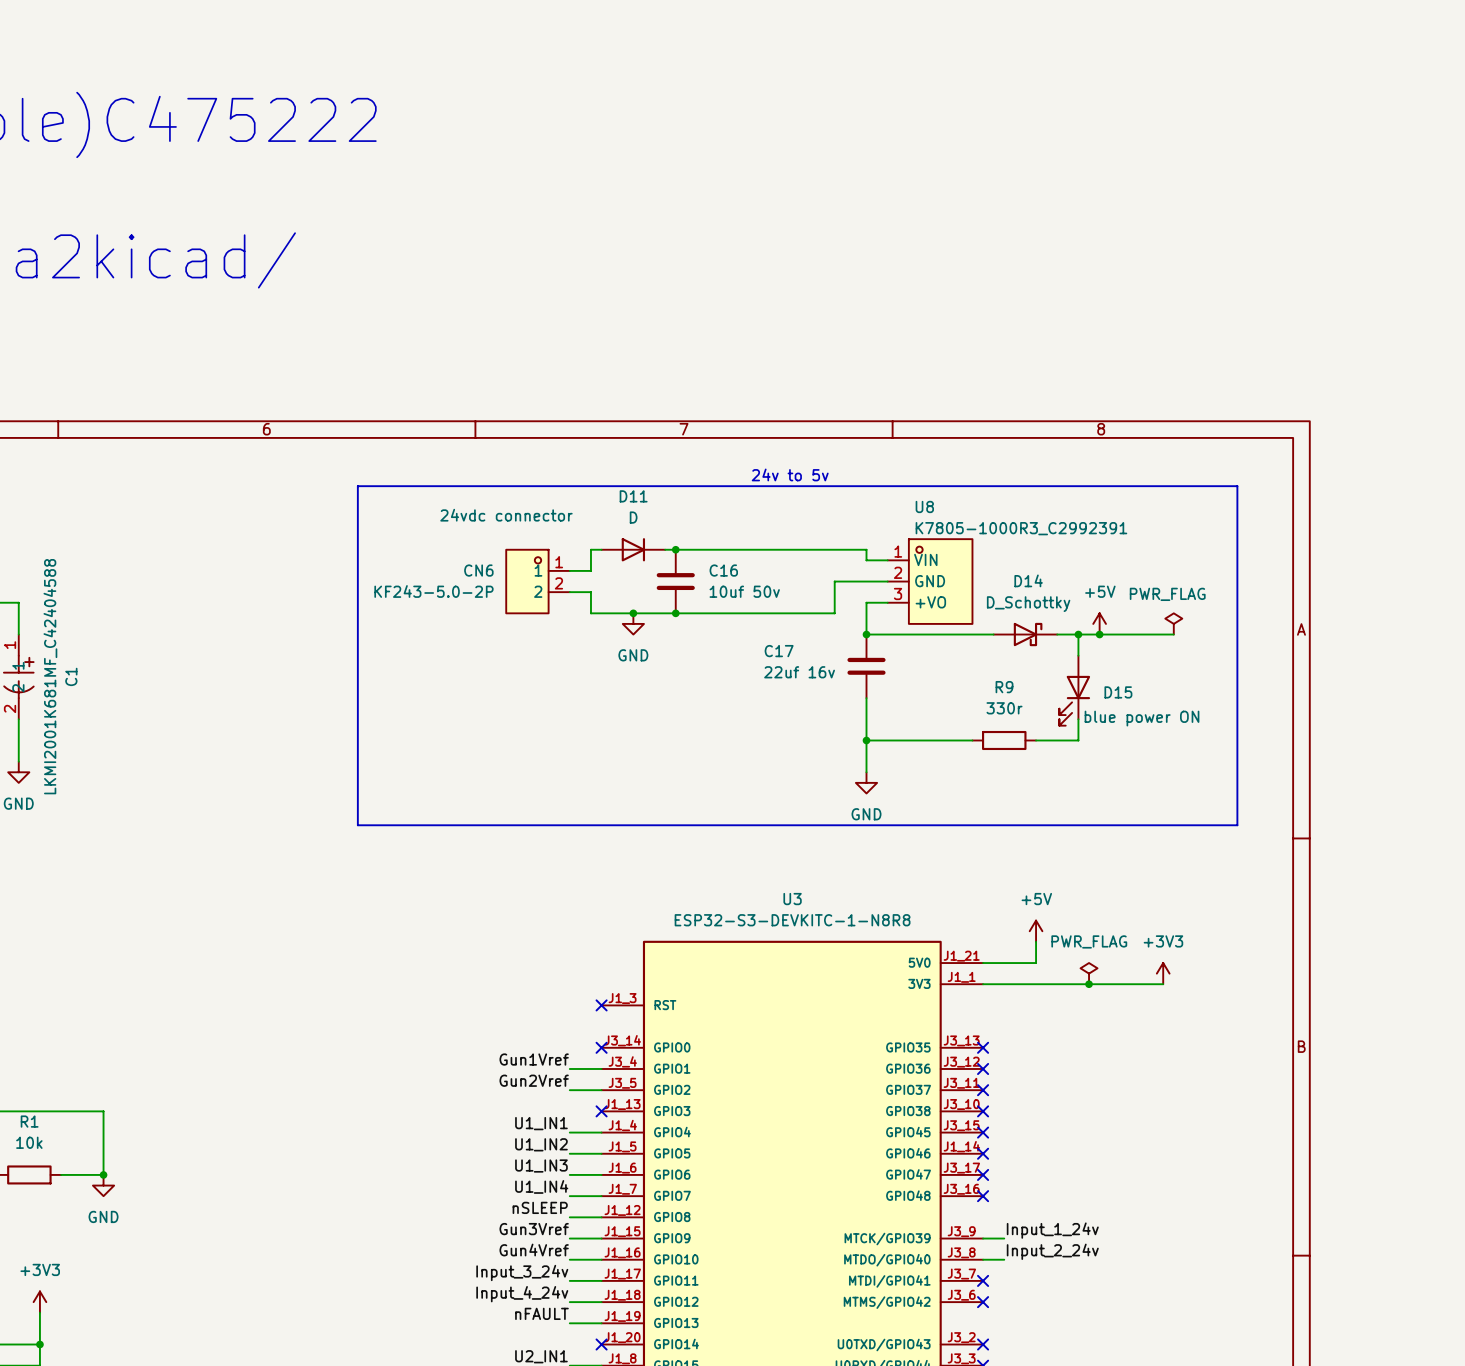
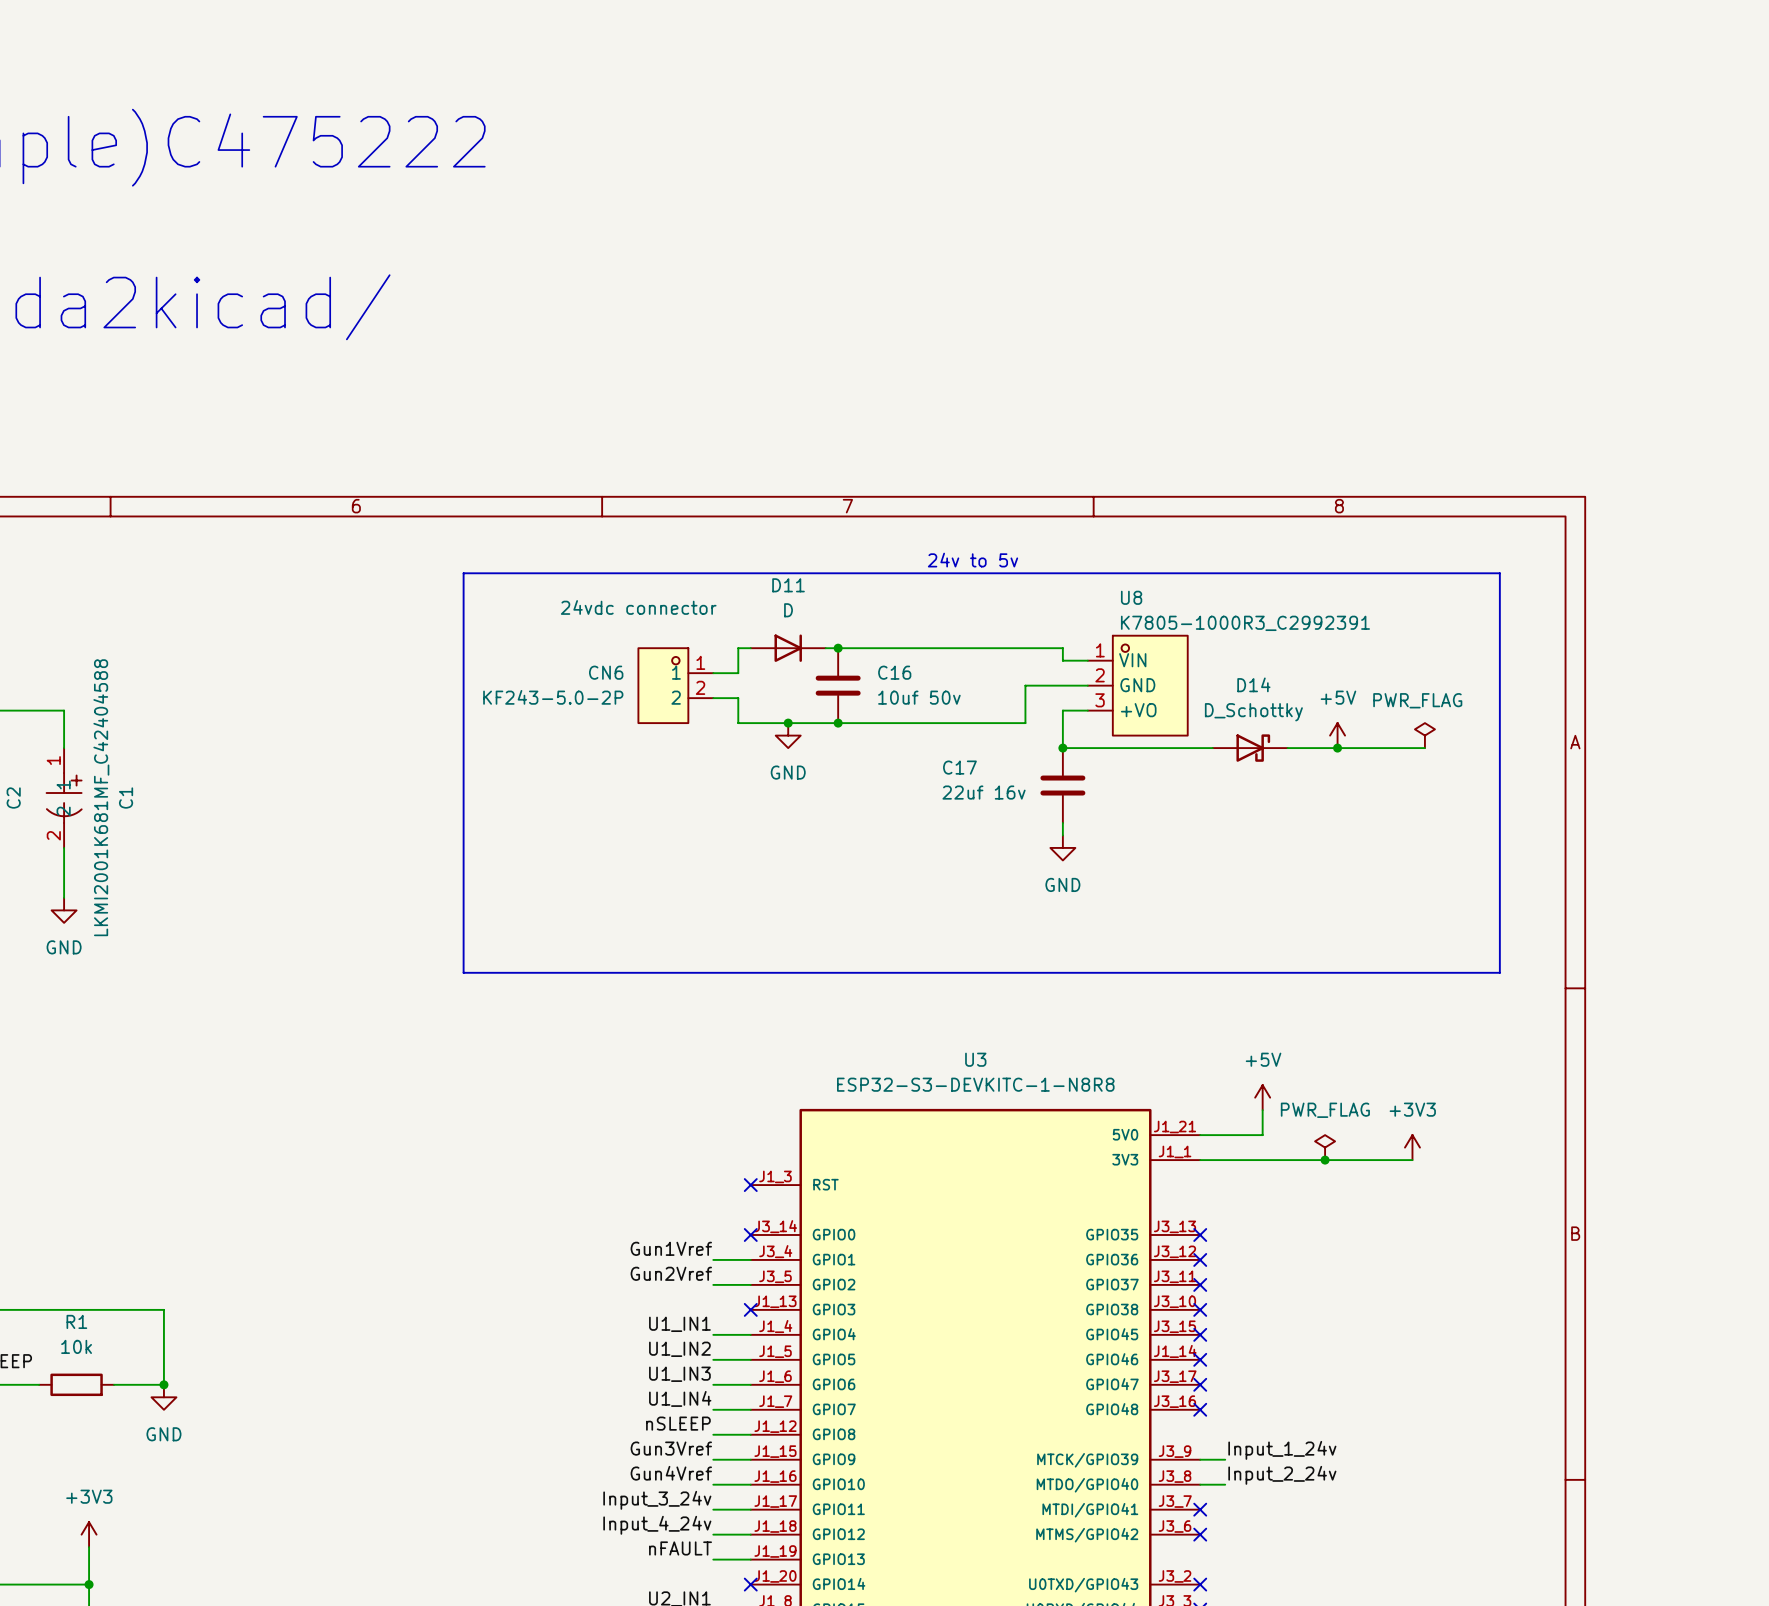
wire: (1078, 634) (1078, 655) -> none
junction: (1078, 634) -> none
D15: blue power ON (1074, 690) -> none
wire: (866, 708) (866, 772) -> none
wire: (1078, 719) (1078, 740) (1036, 740) -> none
wire: (866, 740) (972, 740) -> none
junction: (866, 740) -> none
R9: 330r (1004, 740) -> none
power symbol position: GND (866, 782) -> GND (1062, 847)

